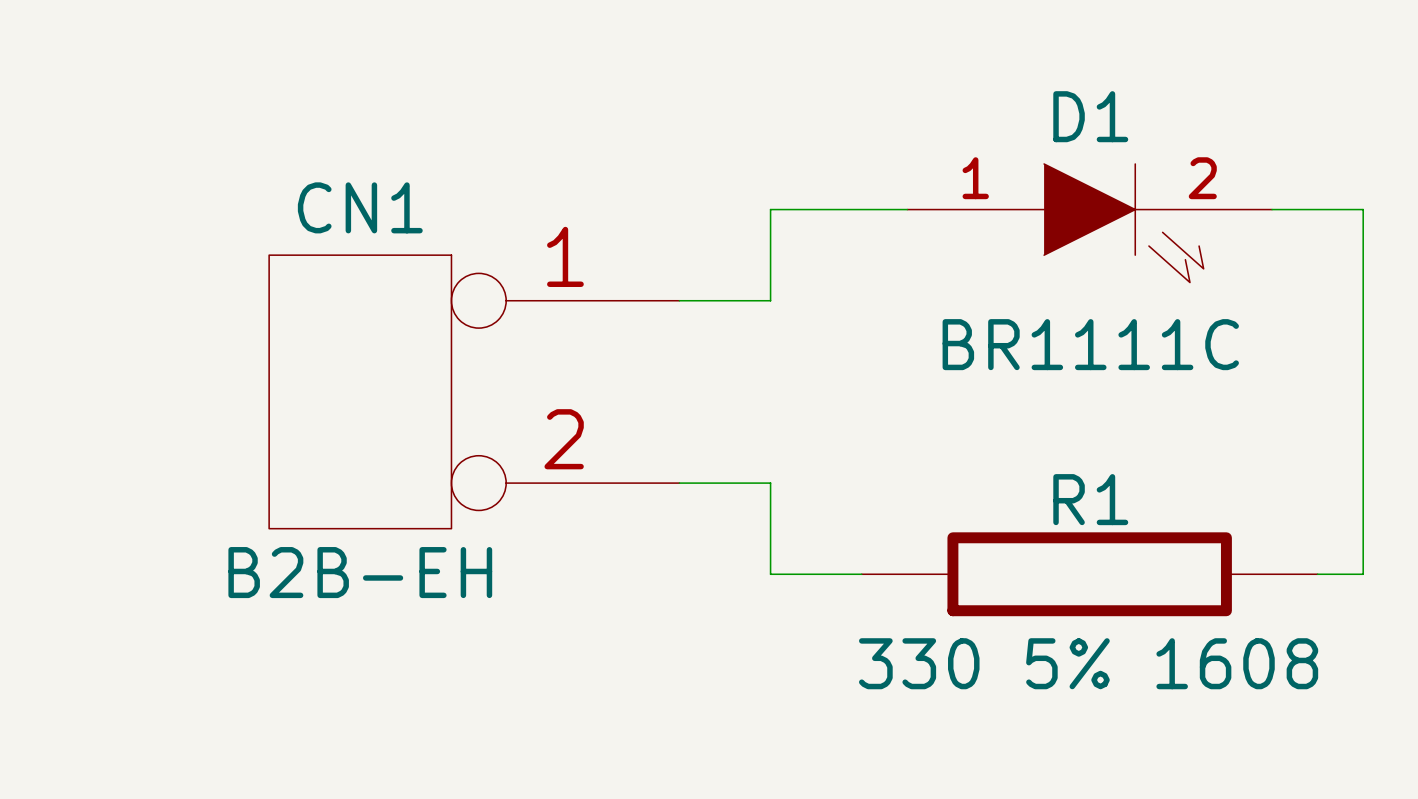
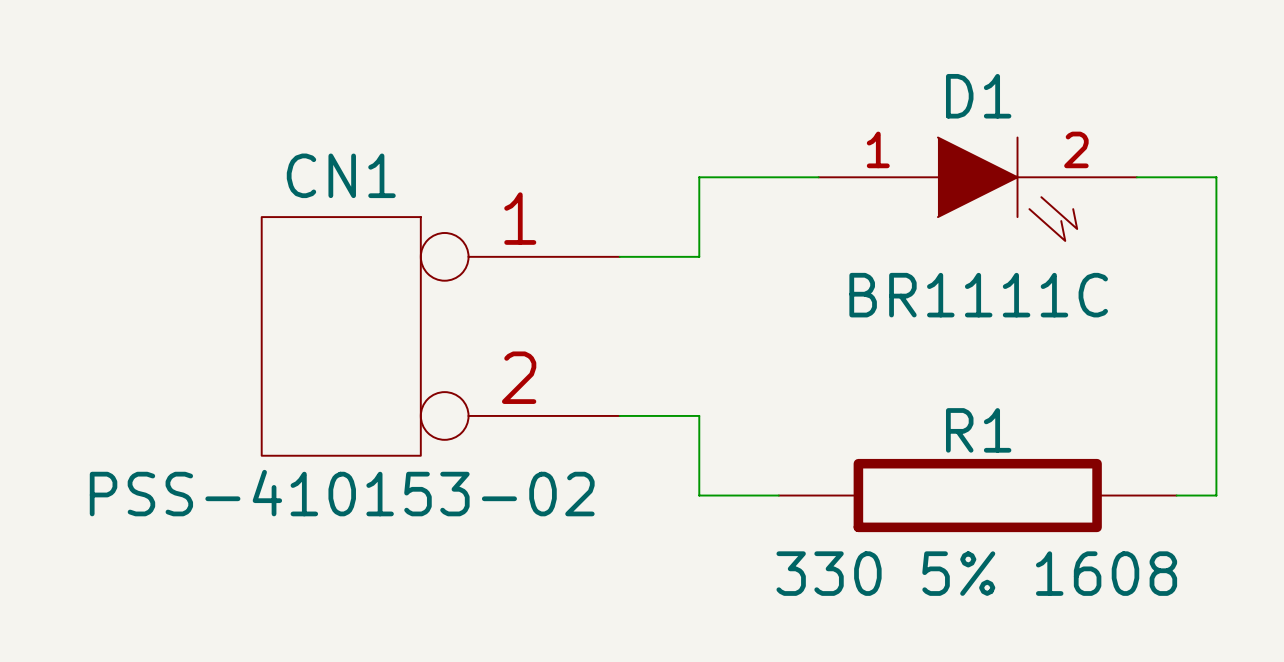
CN1 value: B2B-EH (360, 572) -> PSS-410153-02 (342, 493)

